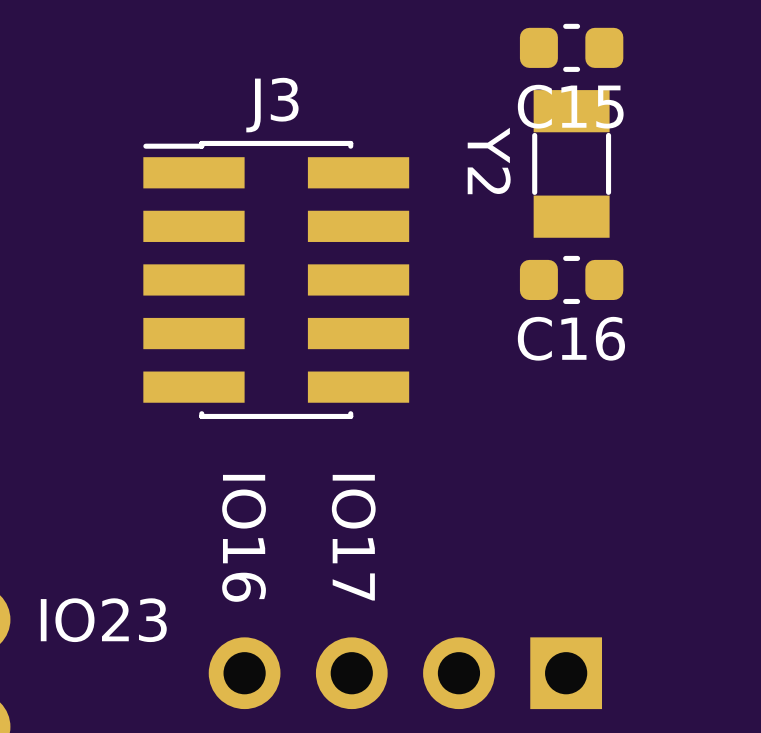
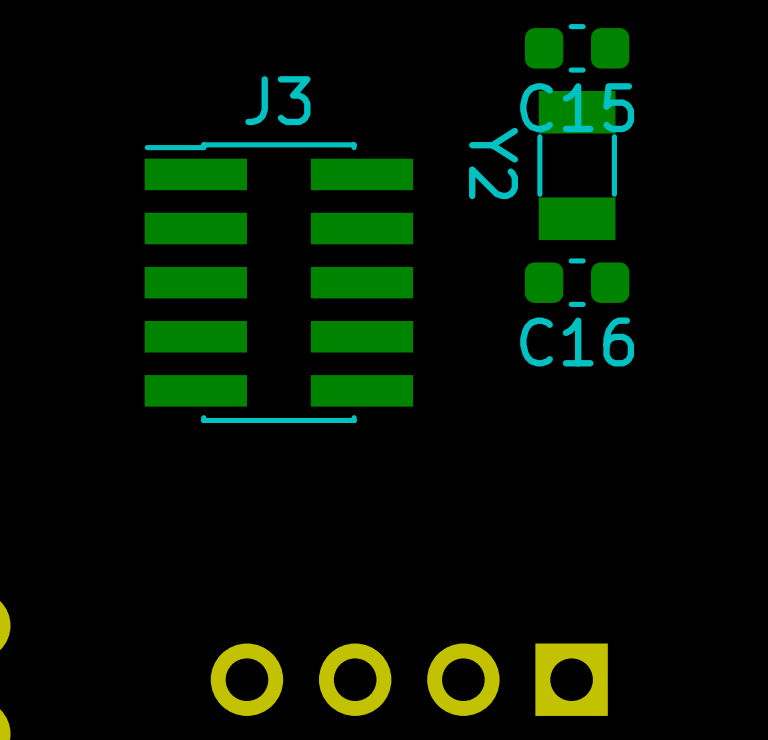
text: IO17 (353, 537) -> none
text: IO16 (244, 538) -> none
text: IO23 (103, 620) -> none

